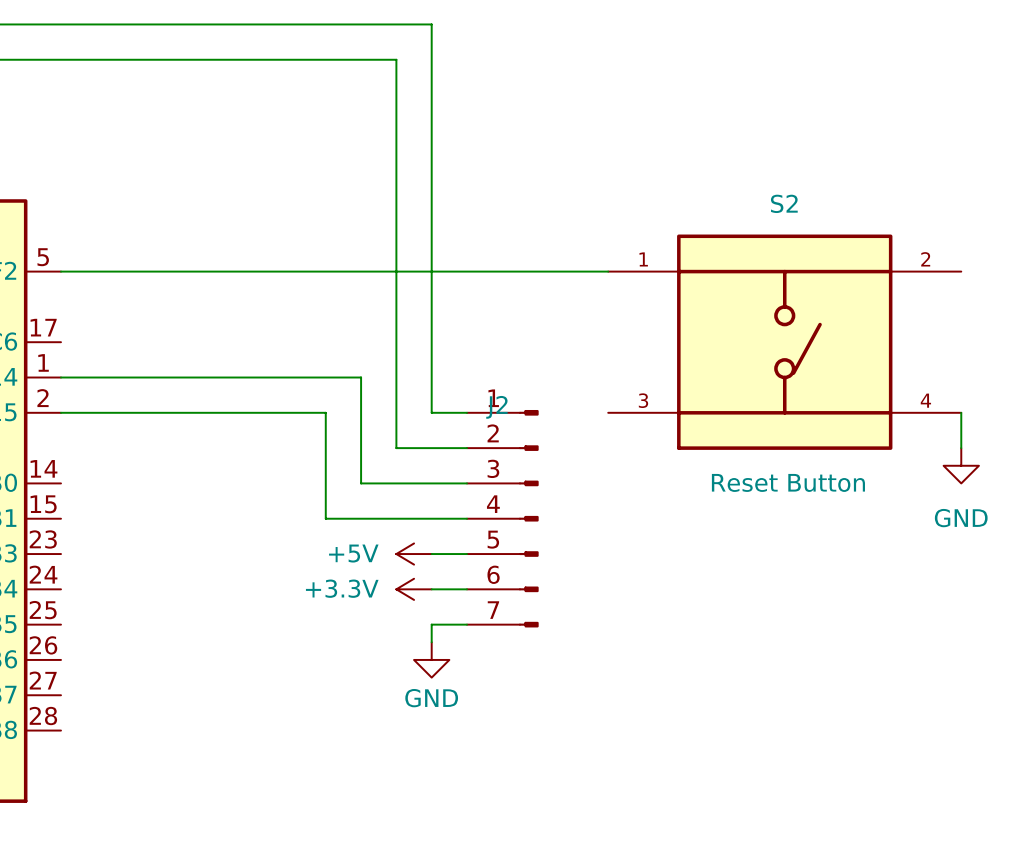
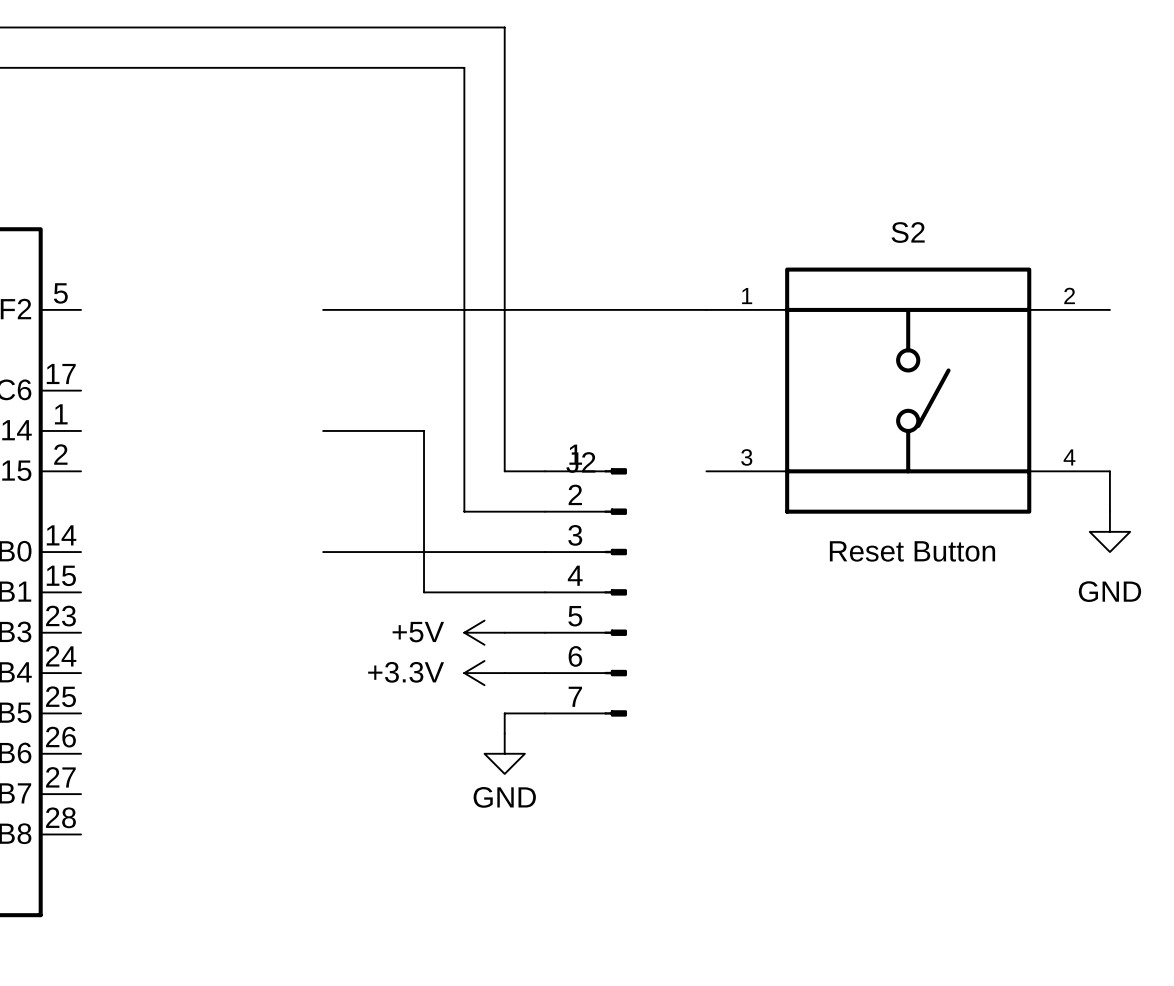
wire: (60, 271) (272, 271) -> none
wire: (60, 377) (272, 377) -> none
wire: (60, 412) (325, 412) (325, 518) (361, 518) -> (323, 552) (424, 552) (424, 592)

